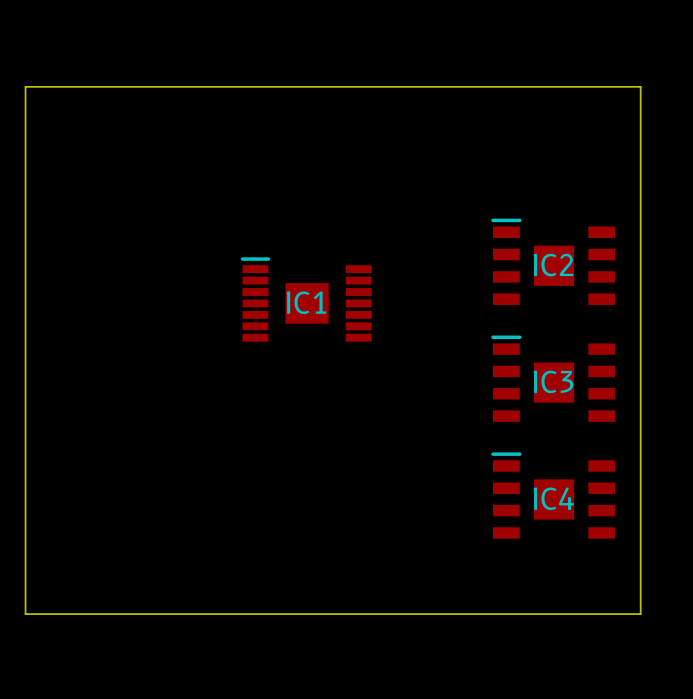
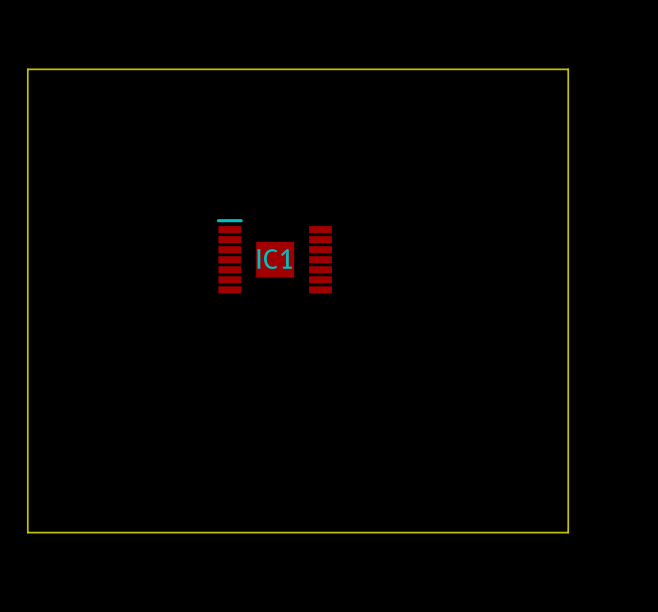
IC2: (553, 261) -> none
IC3: (553, 378) -> none
IC4: (553, 495) -> none

